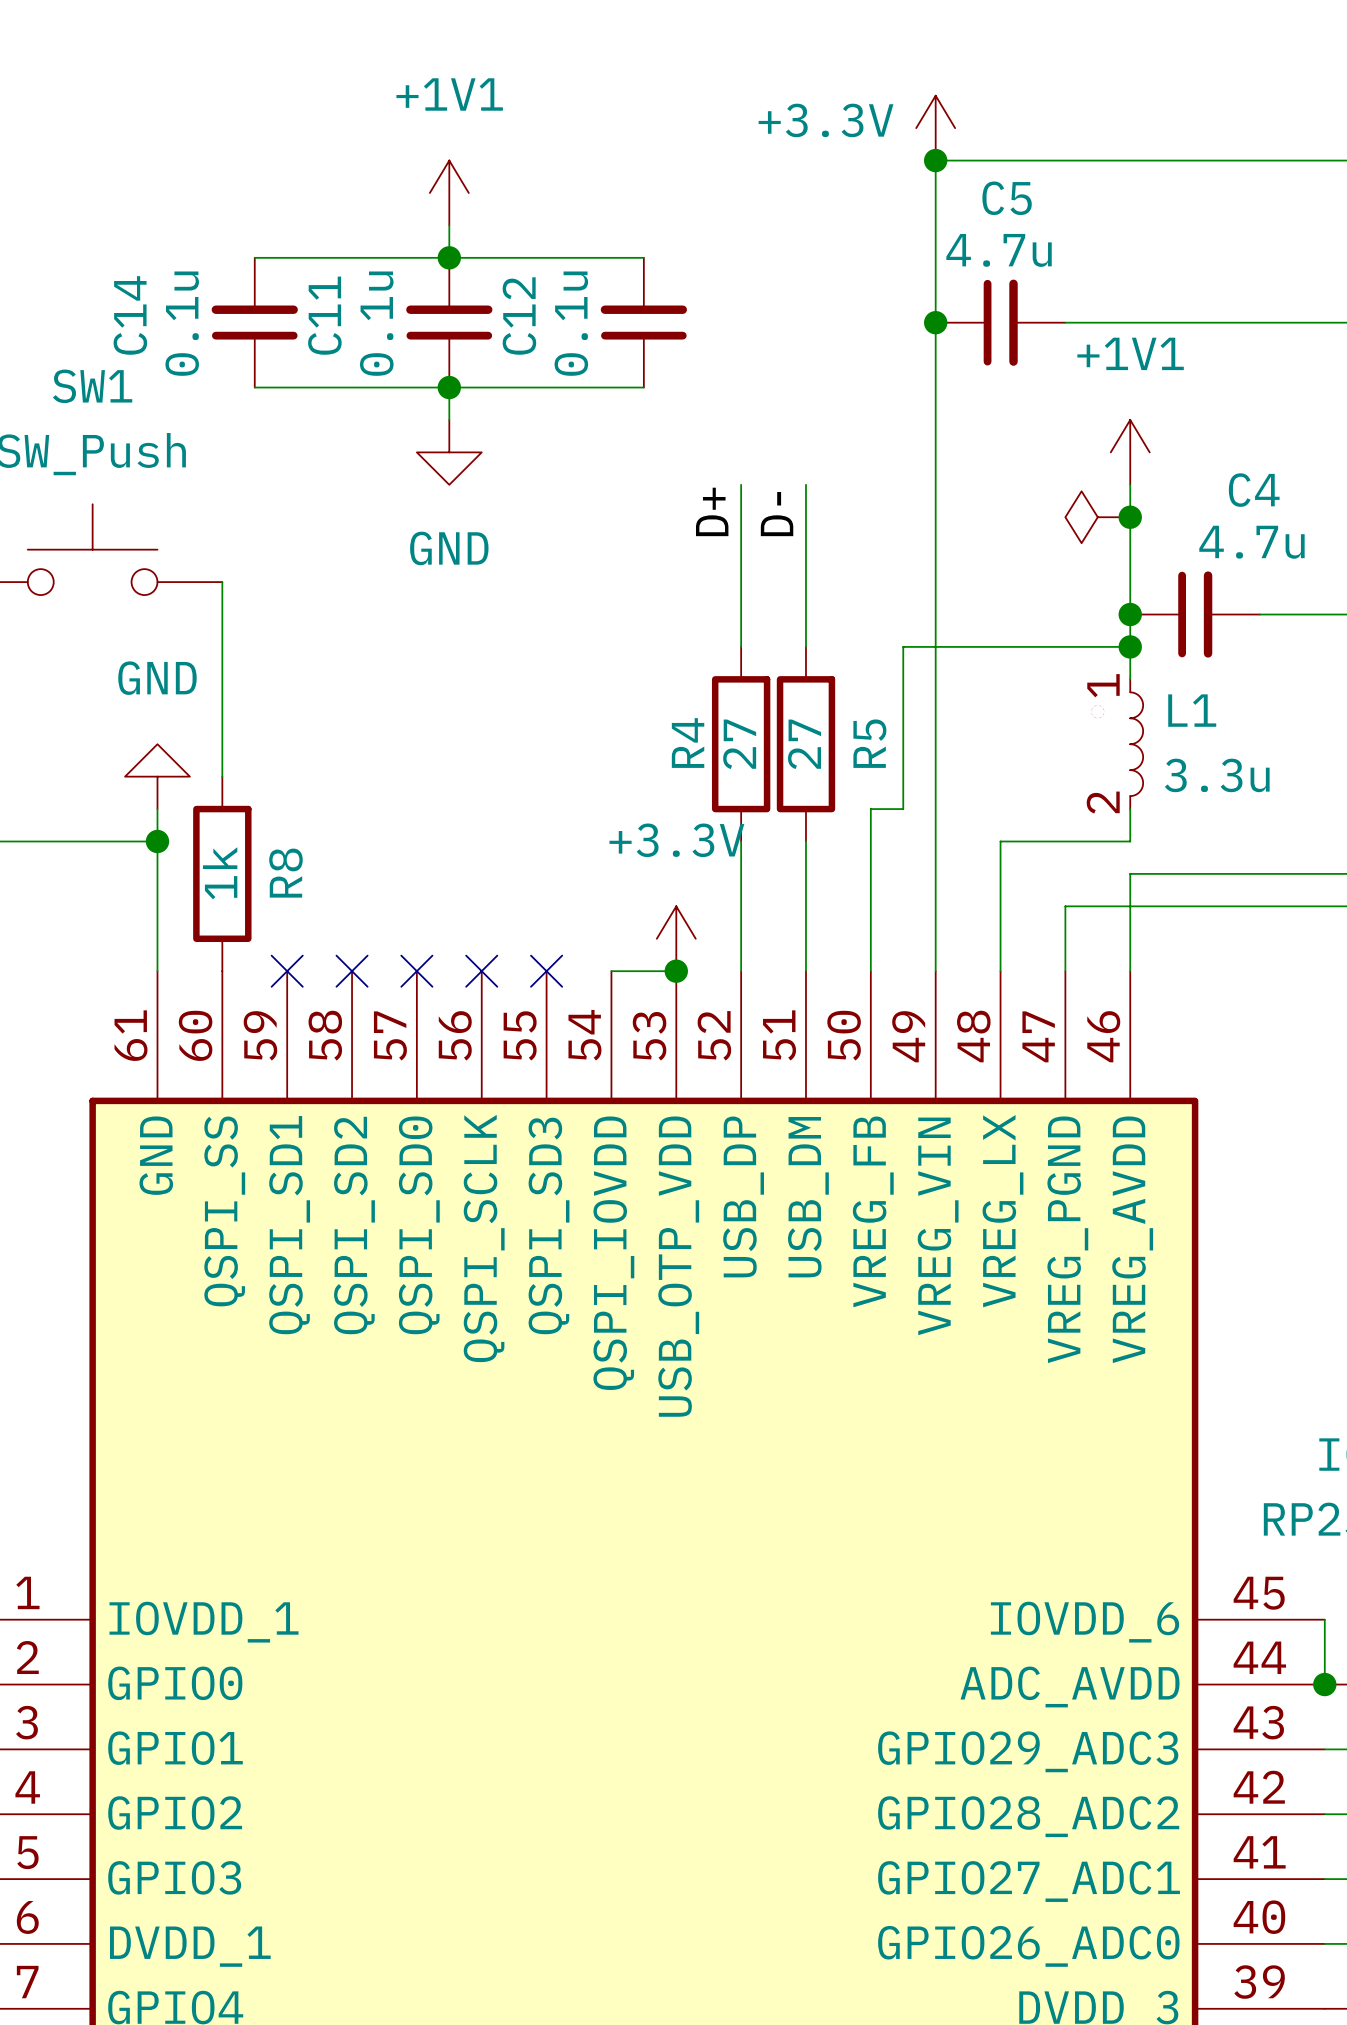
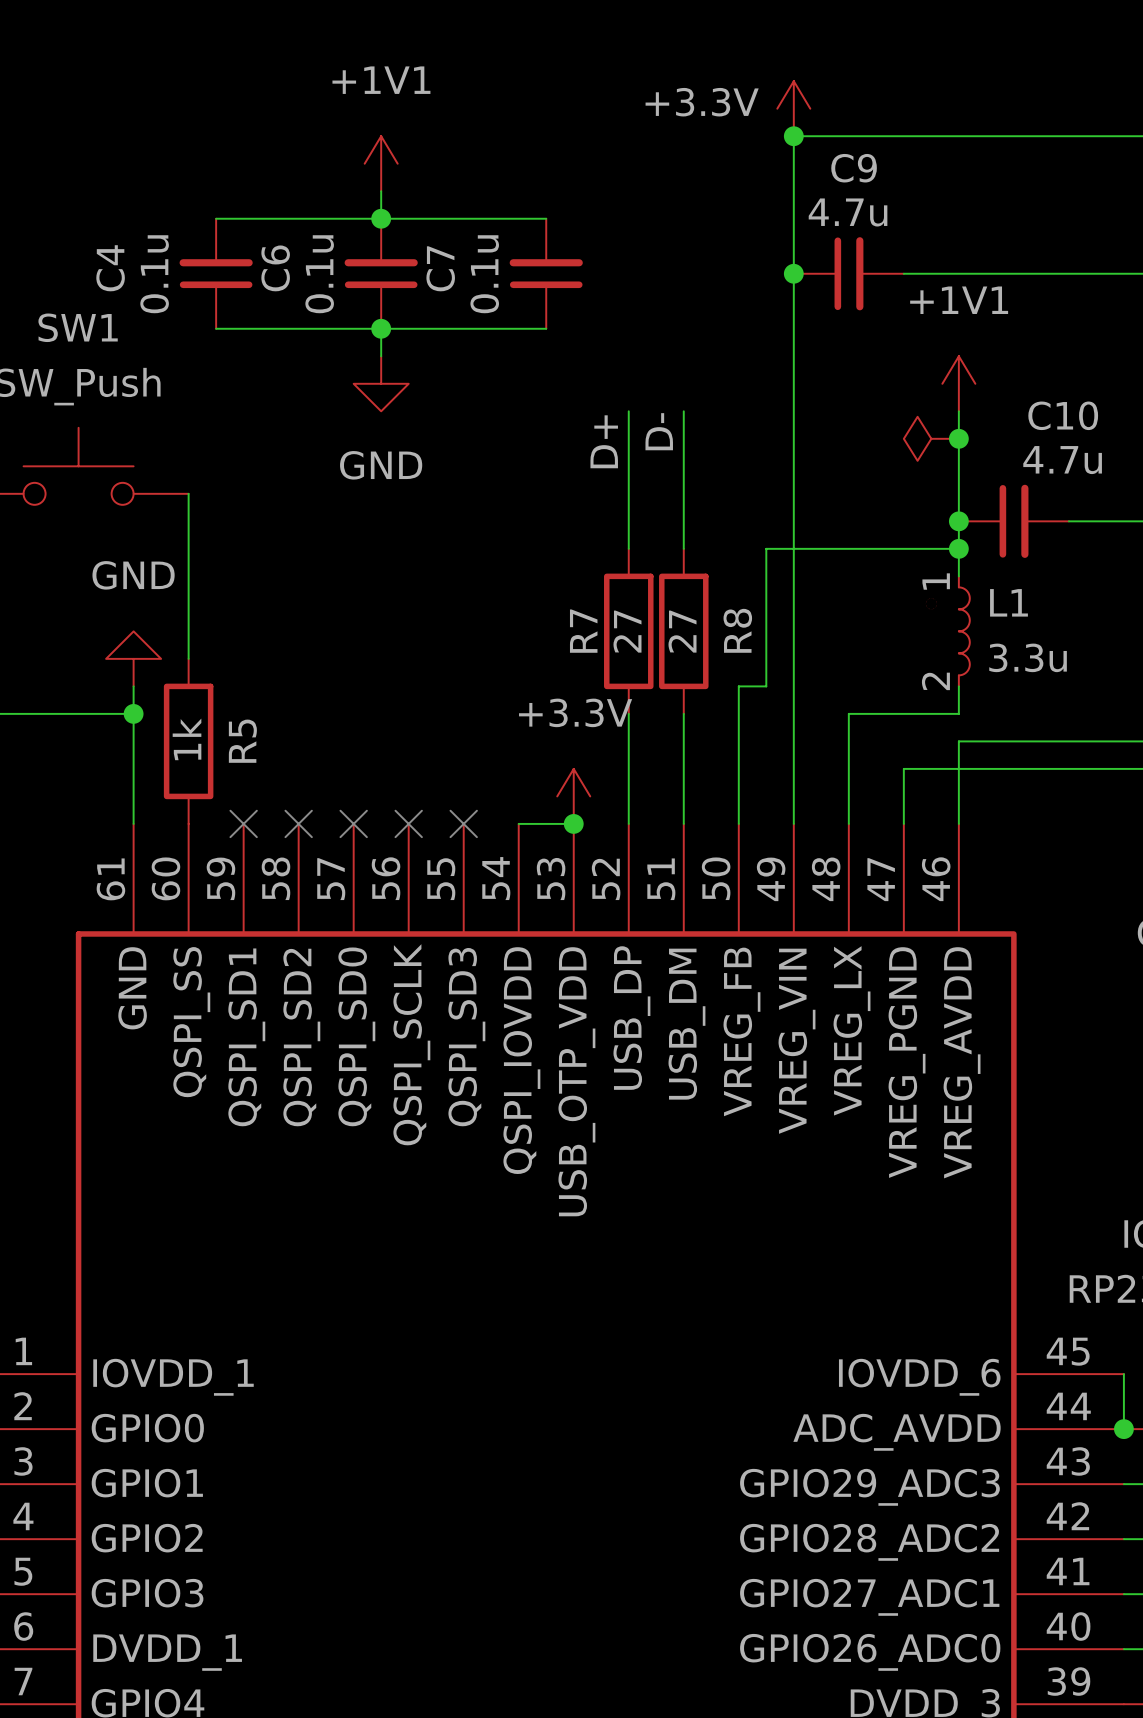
C5 name: C5 (1007, 198) -> C9 (854, 168)
C14 name: C14 (130, 315) -> C4 (110, 268)
C11 name: C11 (324, 315) -> C6 (275, 268)
C12 name: C12 (519, 316) -> C7 (440, 268)
C4 name: C4 (1254, 490) -> C10 (1063, 415)
R4 name: R4 (688, 743) -> R7 (583, 631)
R5 name: R5 (869, 743) -> R8 (737, 630)
R8 name: R8 (285, 873) -> R5 (242, 741)

